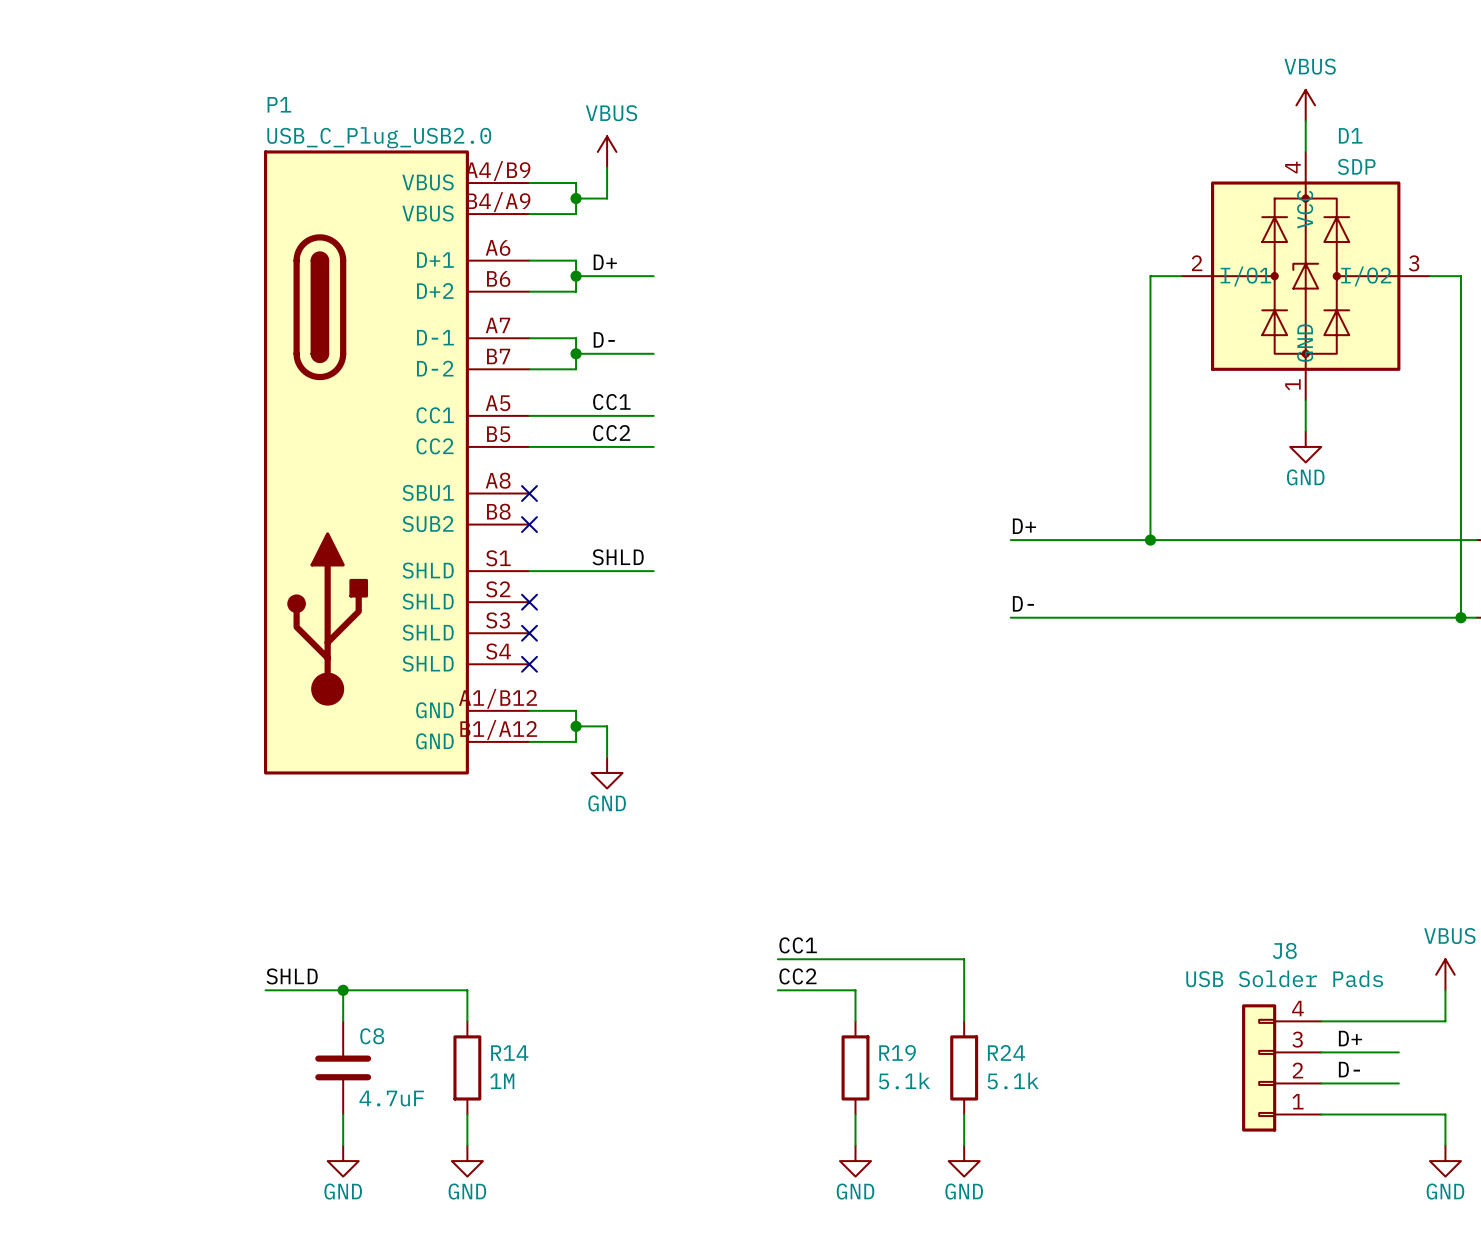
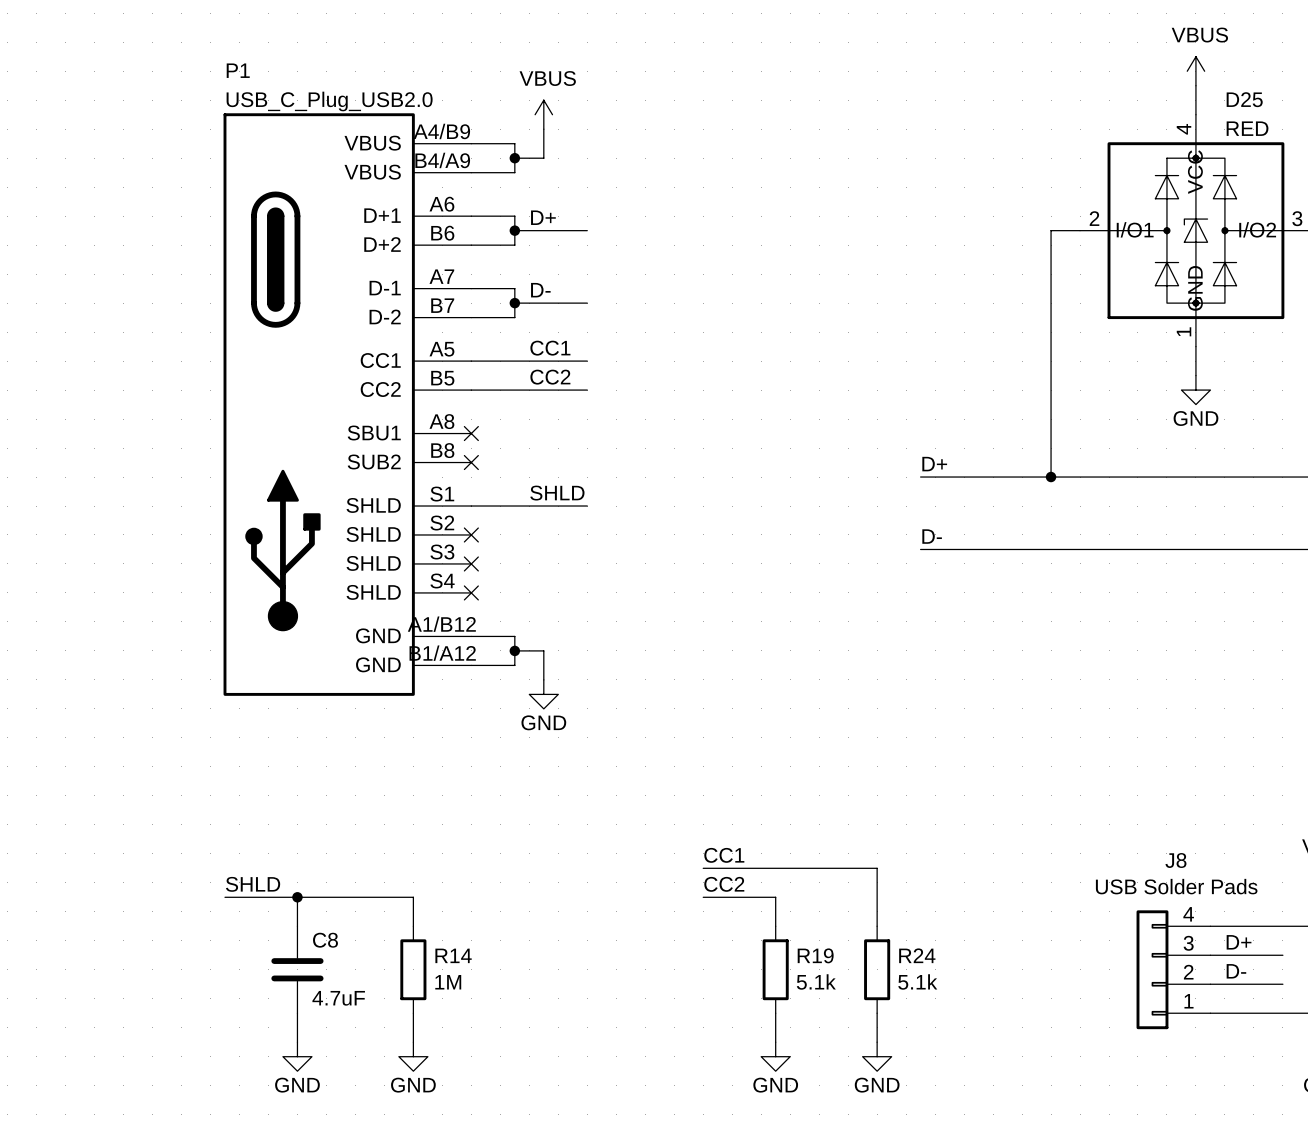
D1 name: D1 (1350, 135) -> D25 (1244, 99)
D1 value: SDP (1356, 166) -> RED (1247, 128)

